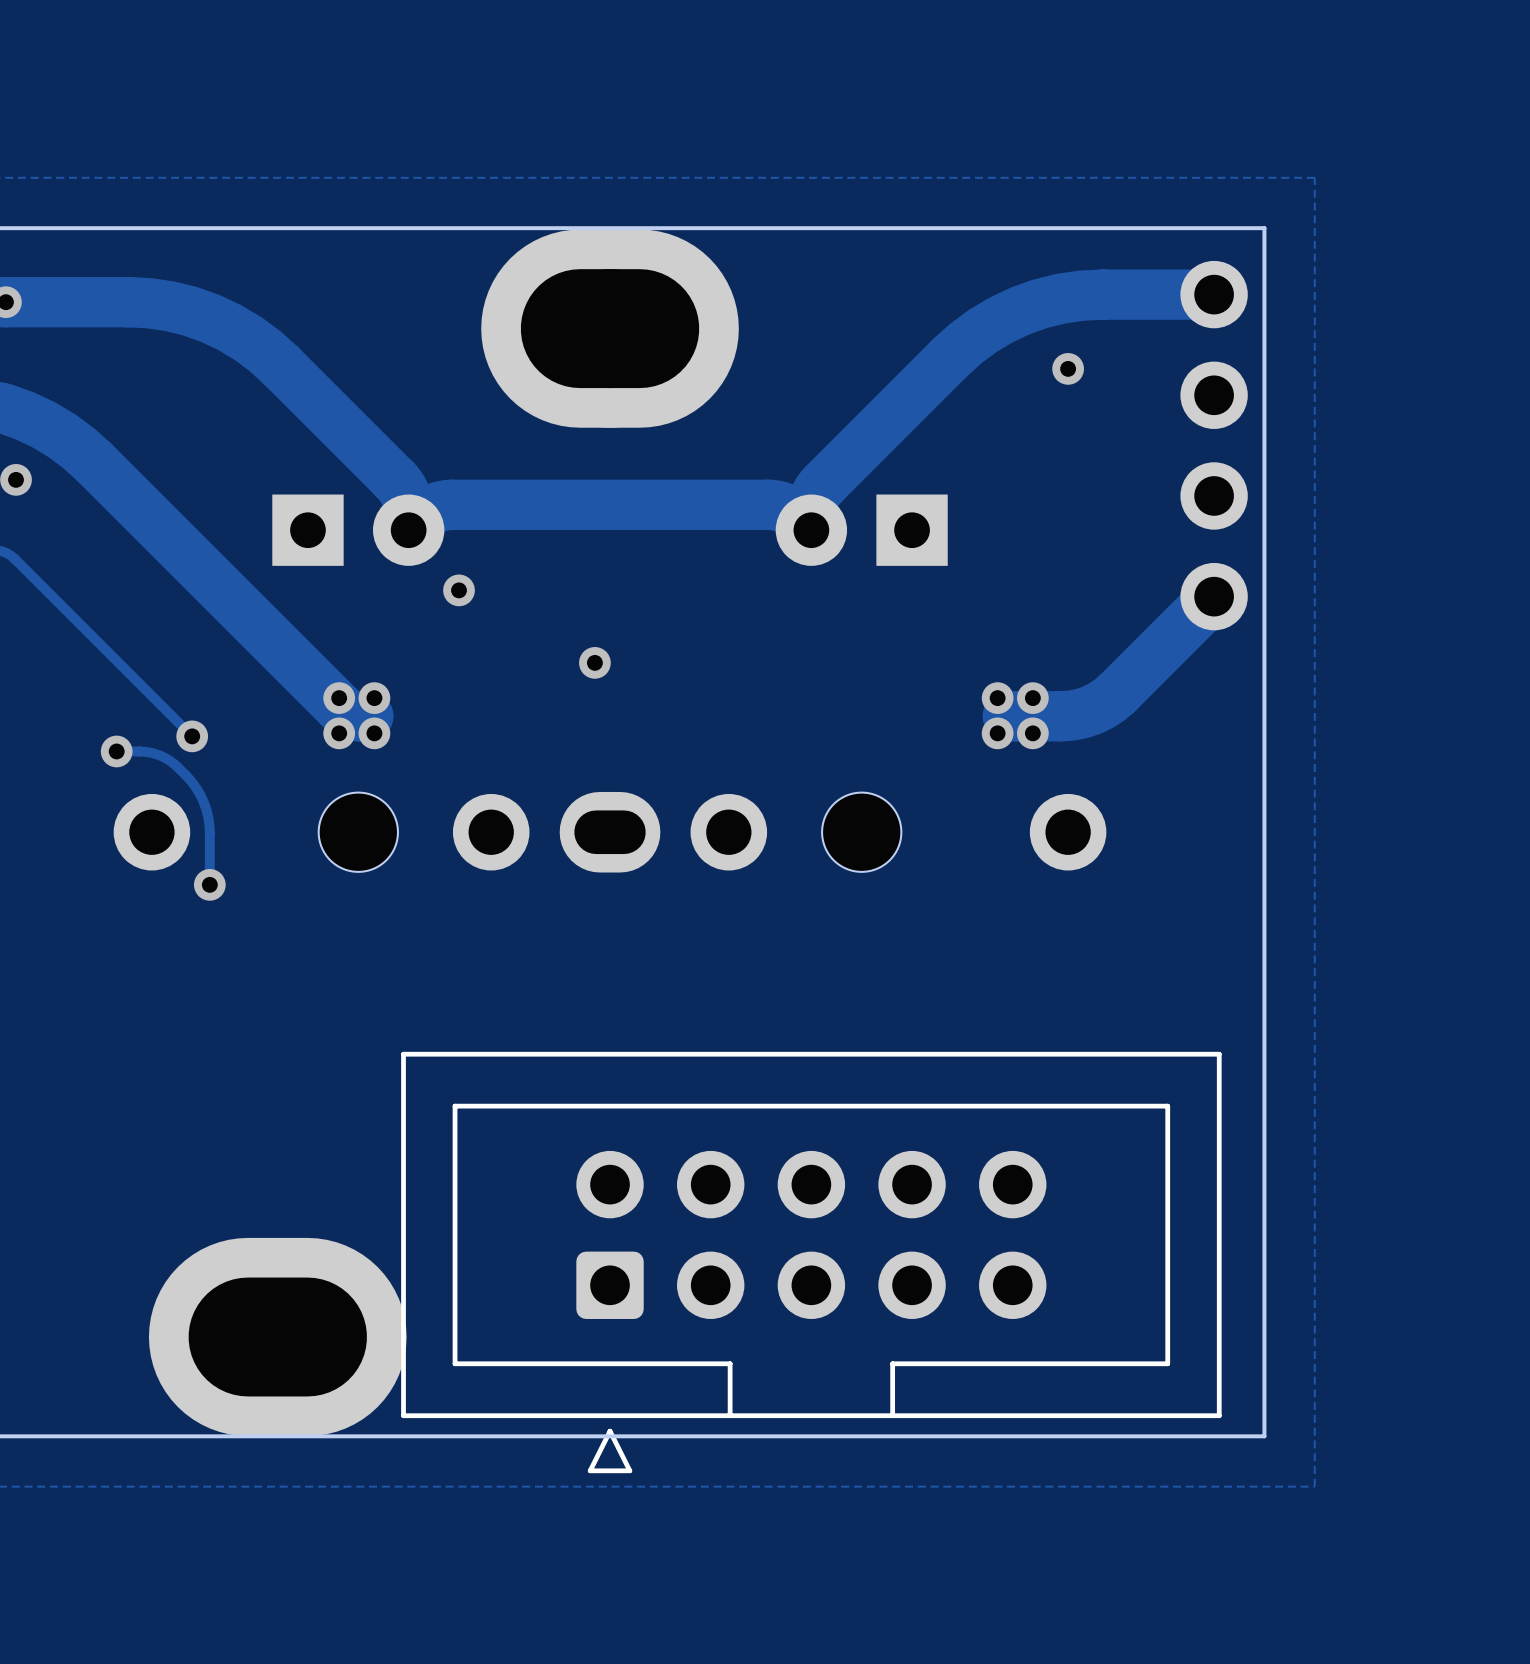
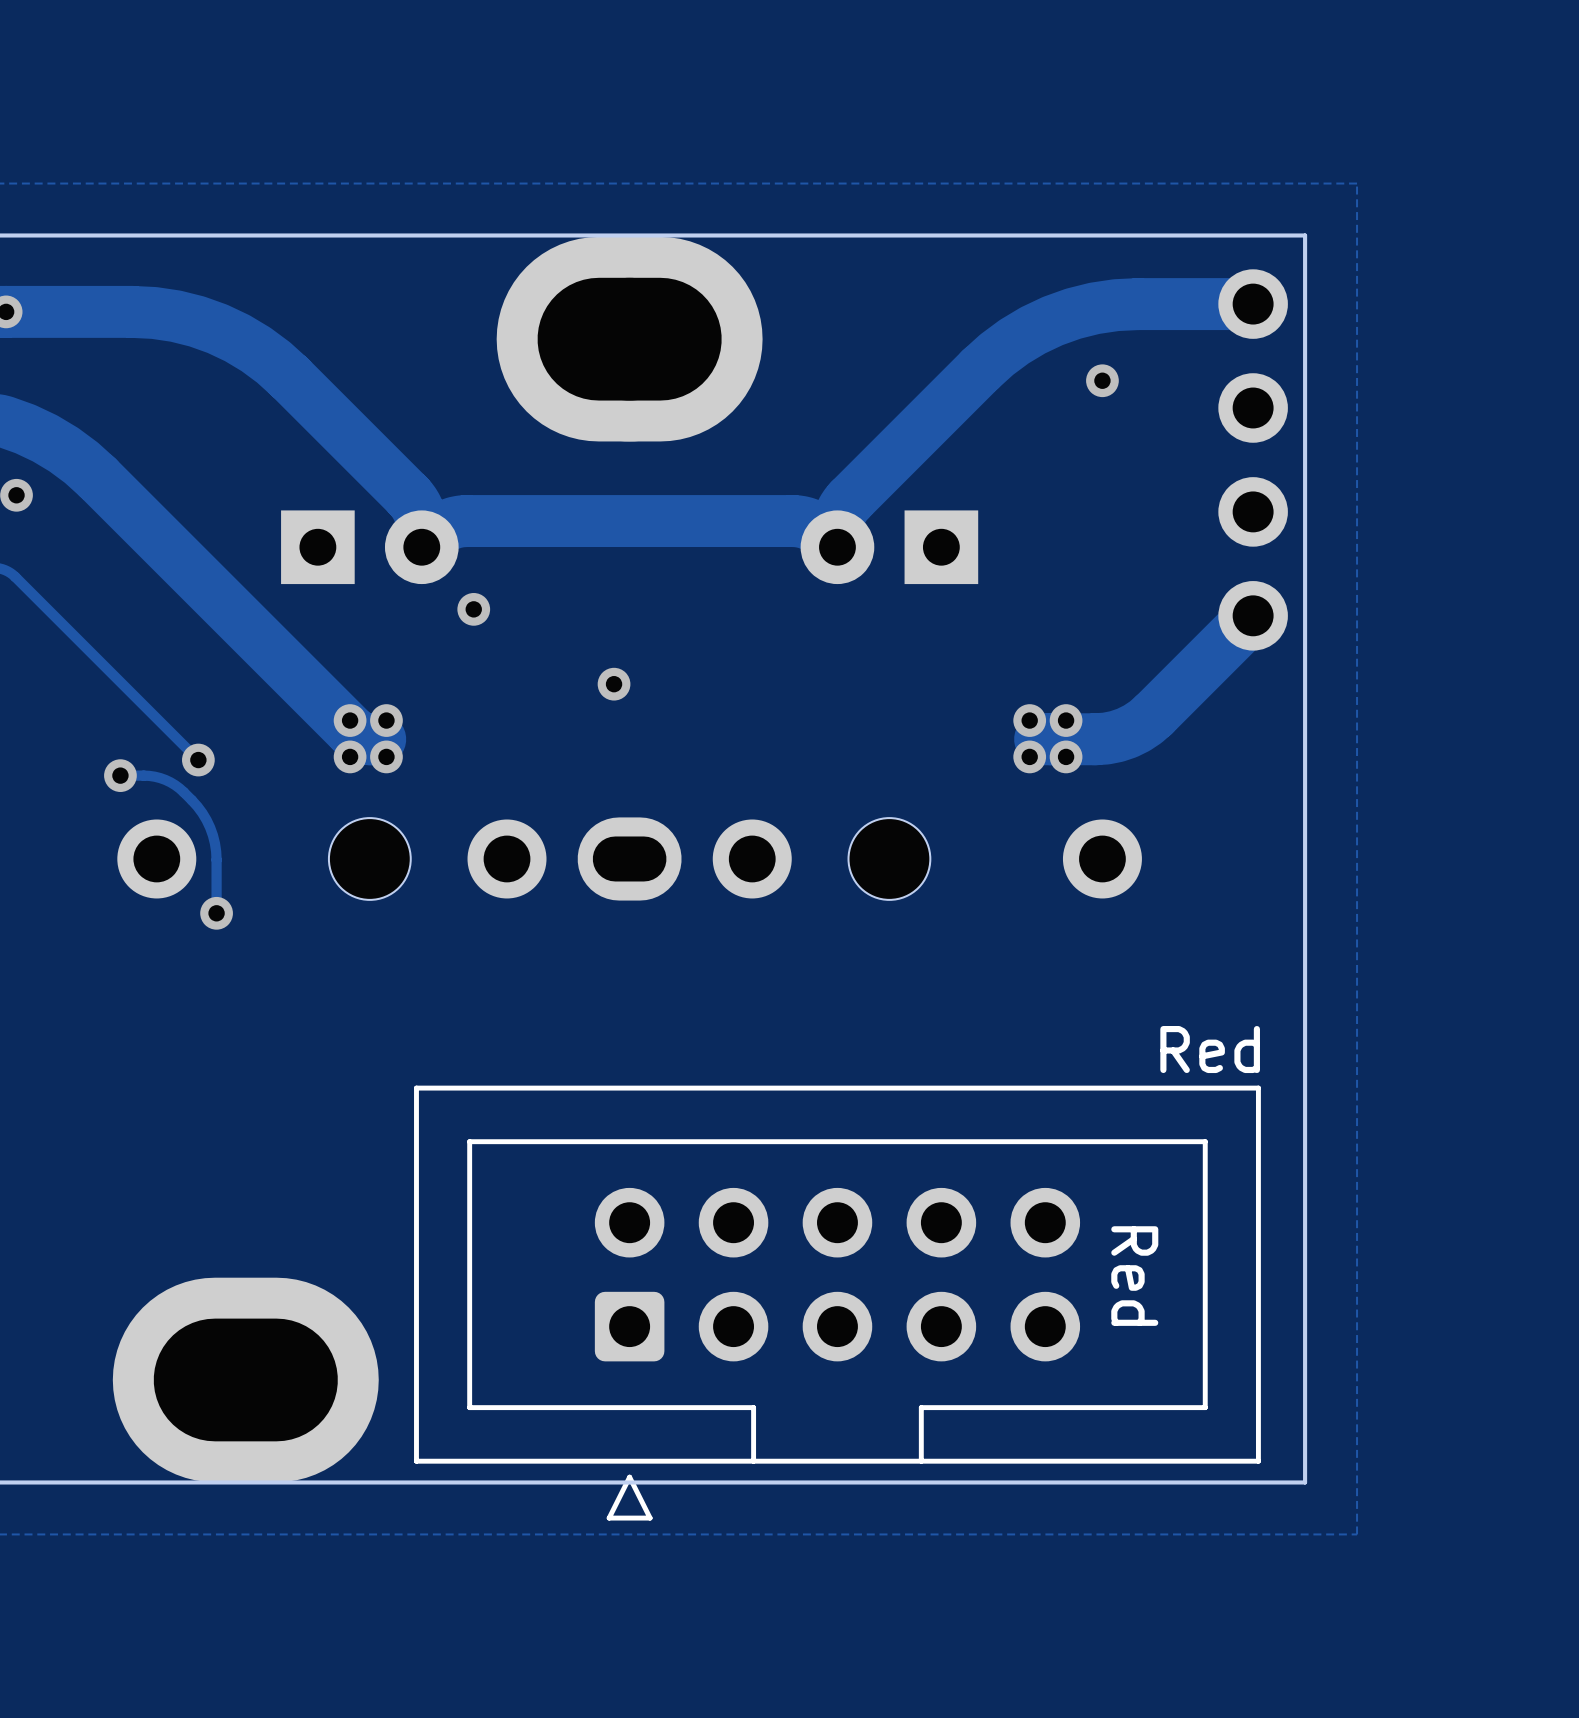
text: none -> Red (1210, 1049)
text: none -> Red (1134, 1276)
part position: (277, 1337) -> (245, 1379)

